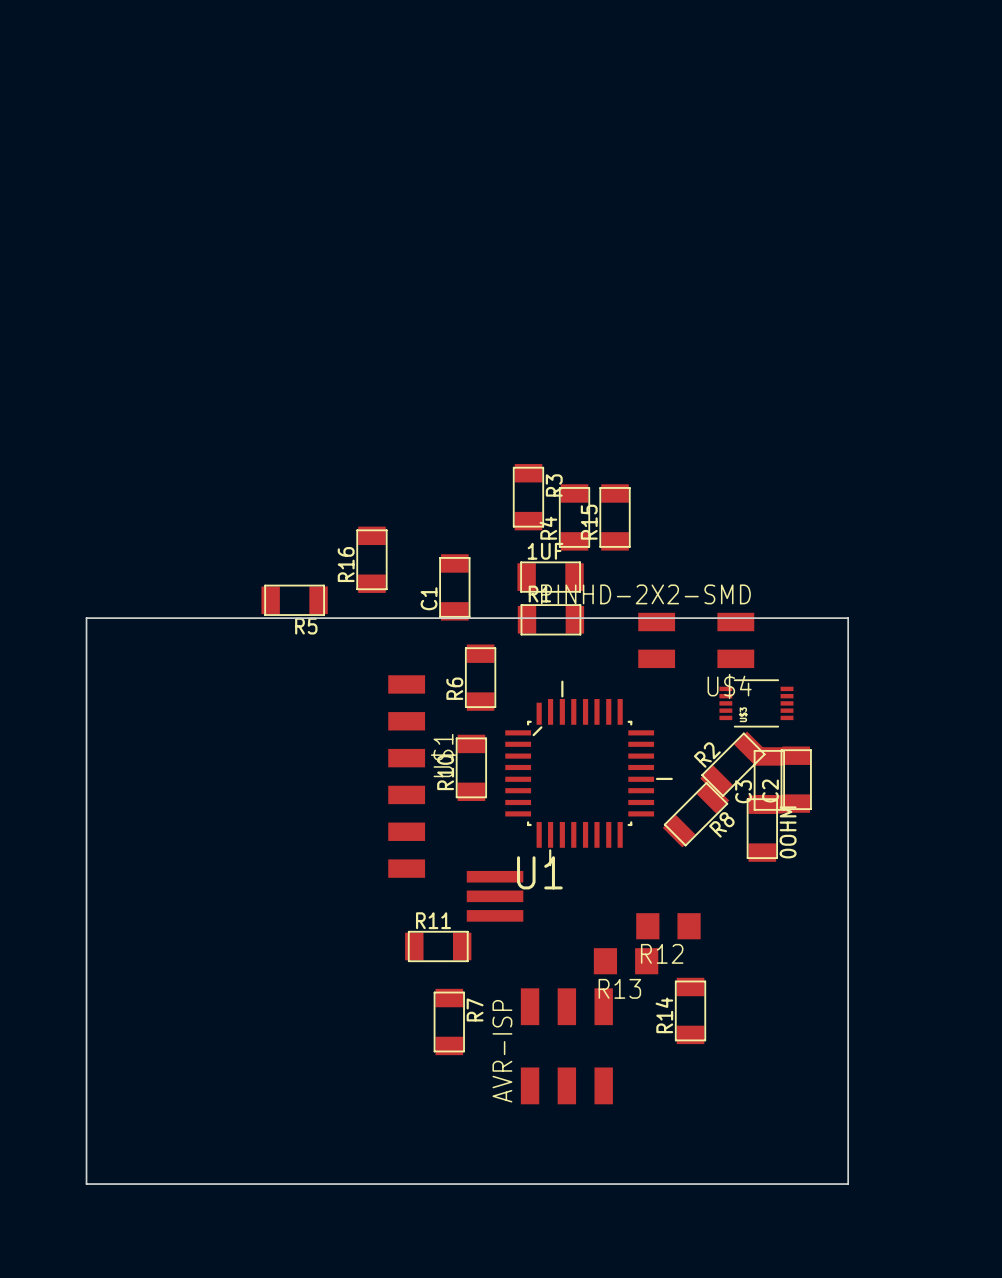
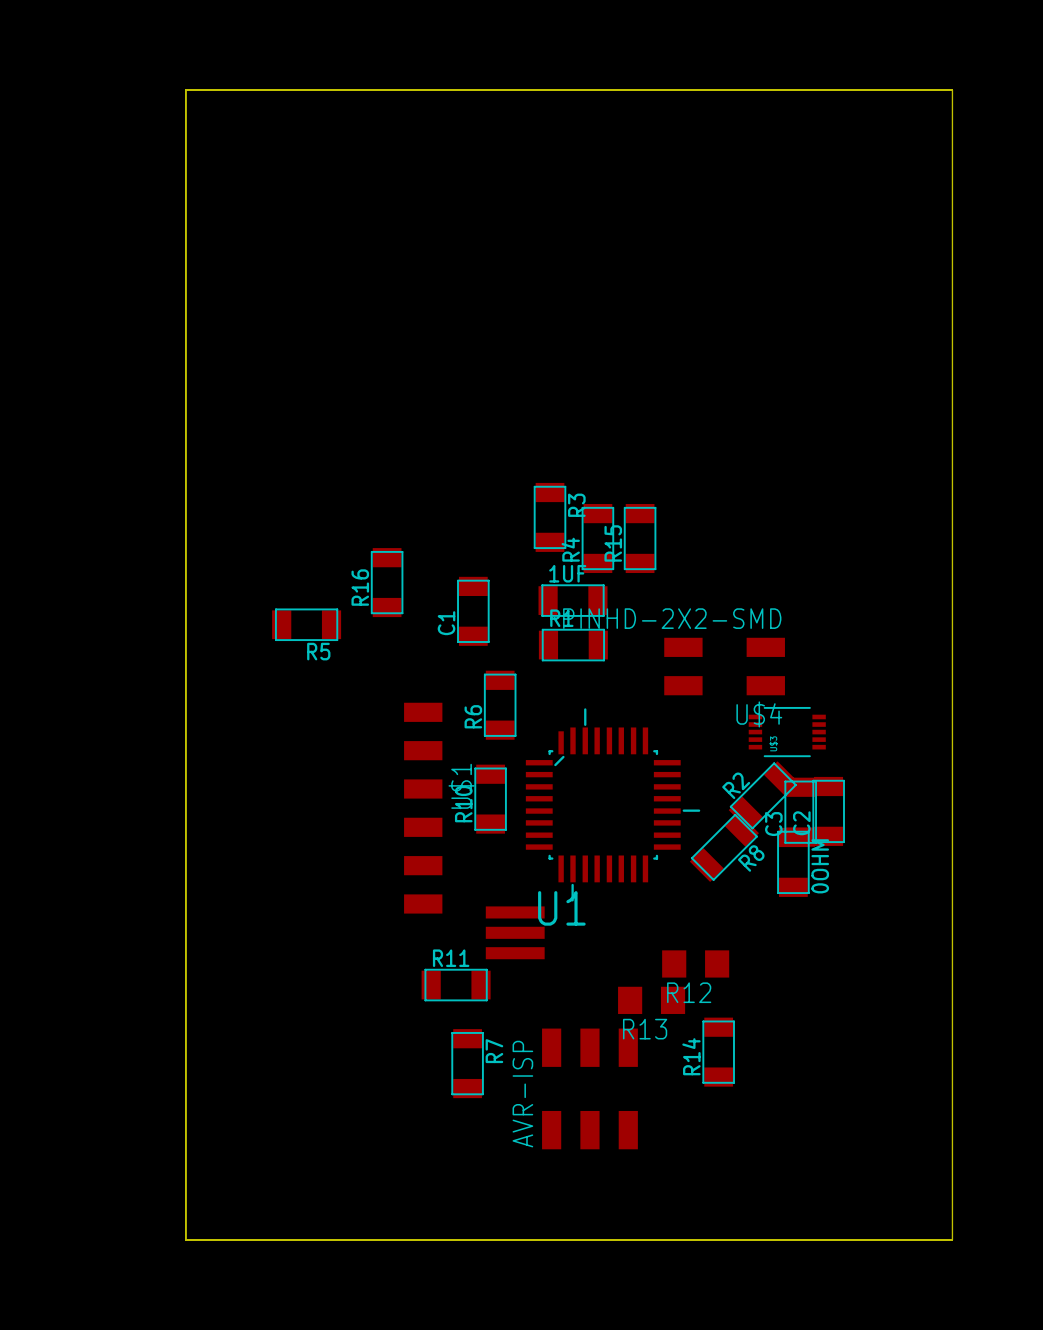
board edge: none -> (185, 90) (185, 1239) (952, 1239) (952, 90) (185, 90)
board edge: (86, 618) (848, 618) (848, 1184) (86, 1184) (86, 618) -> none

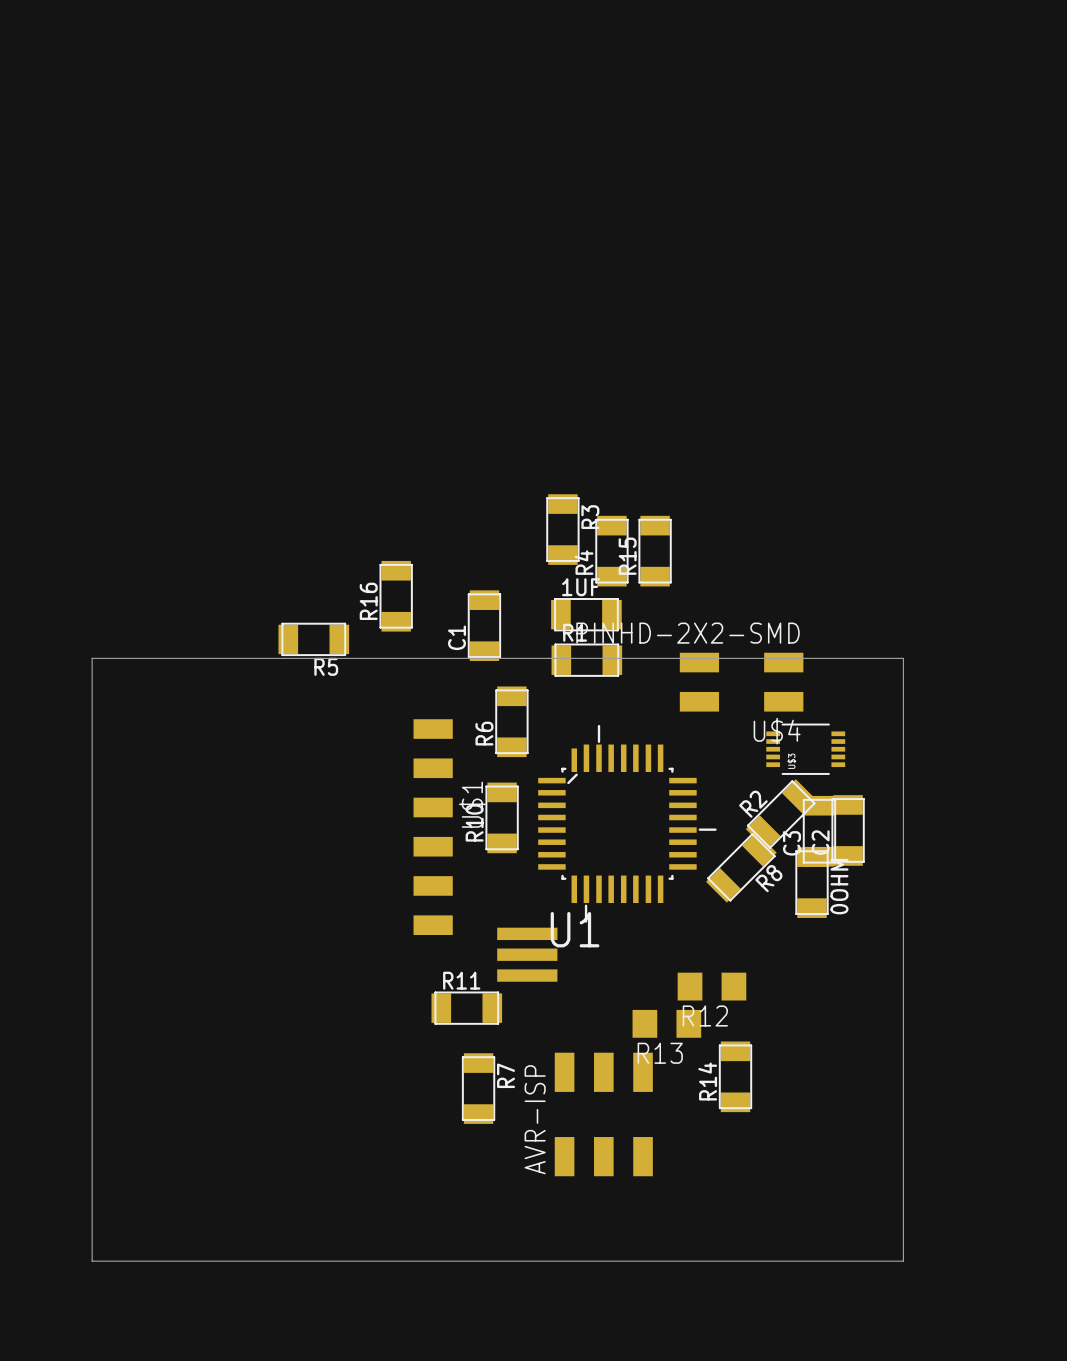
board edge: (185, 90) (185, 1239) (952, 1239) (952, 90) (185, 90) -> none
board edge: none -> (92, 658) (903, 658) (903, 1261) (92, 1261) (92, 658)

